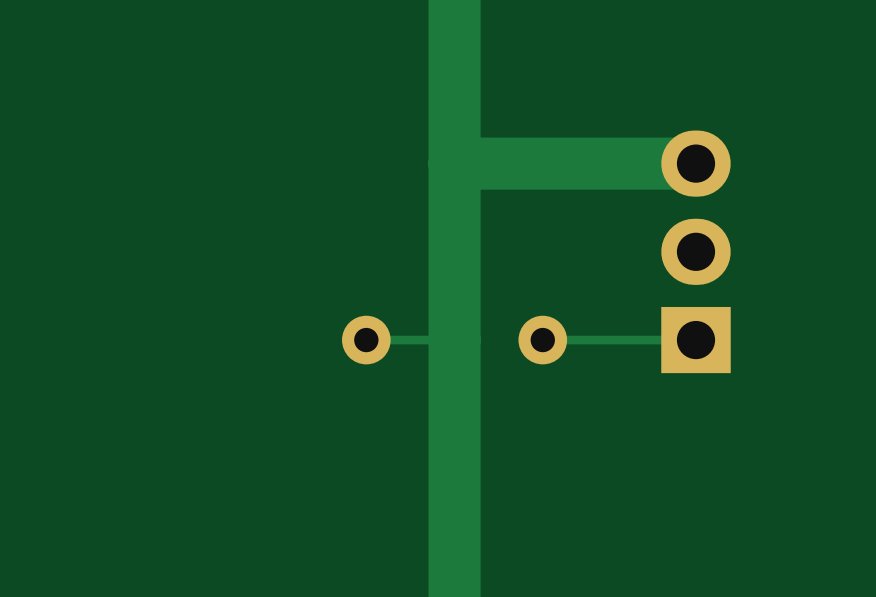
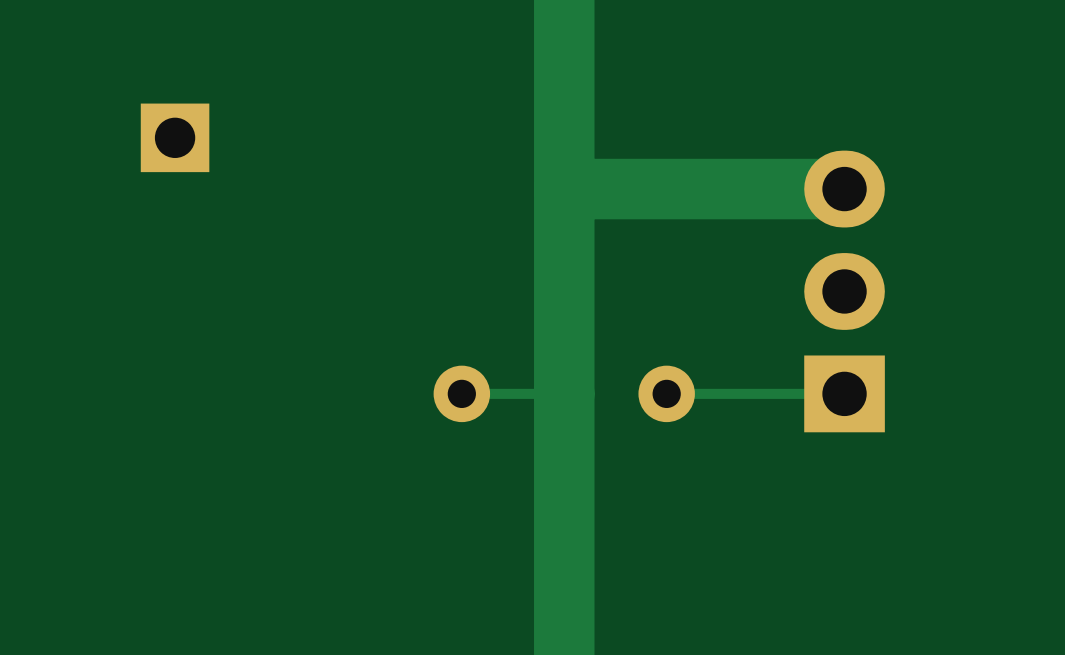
part: none -> (175, 137)

